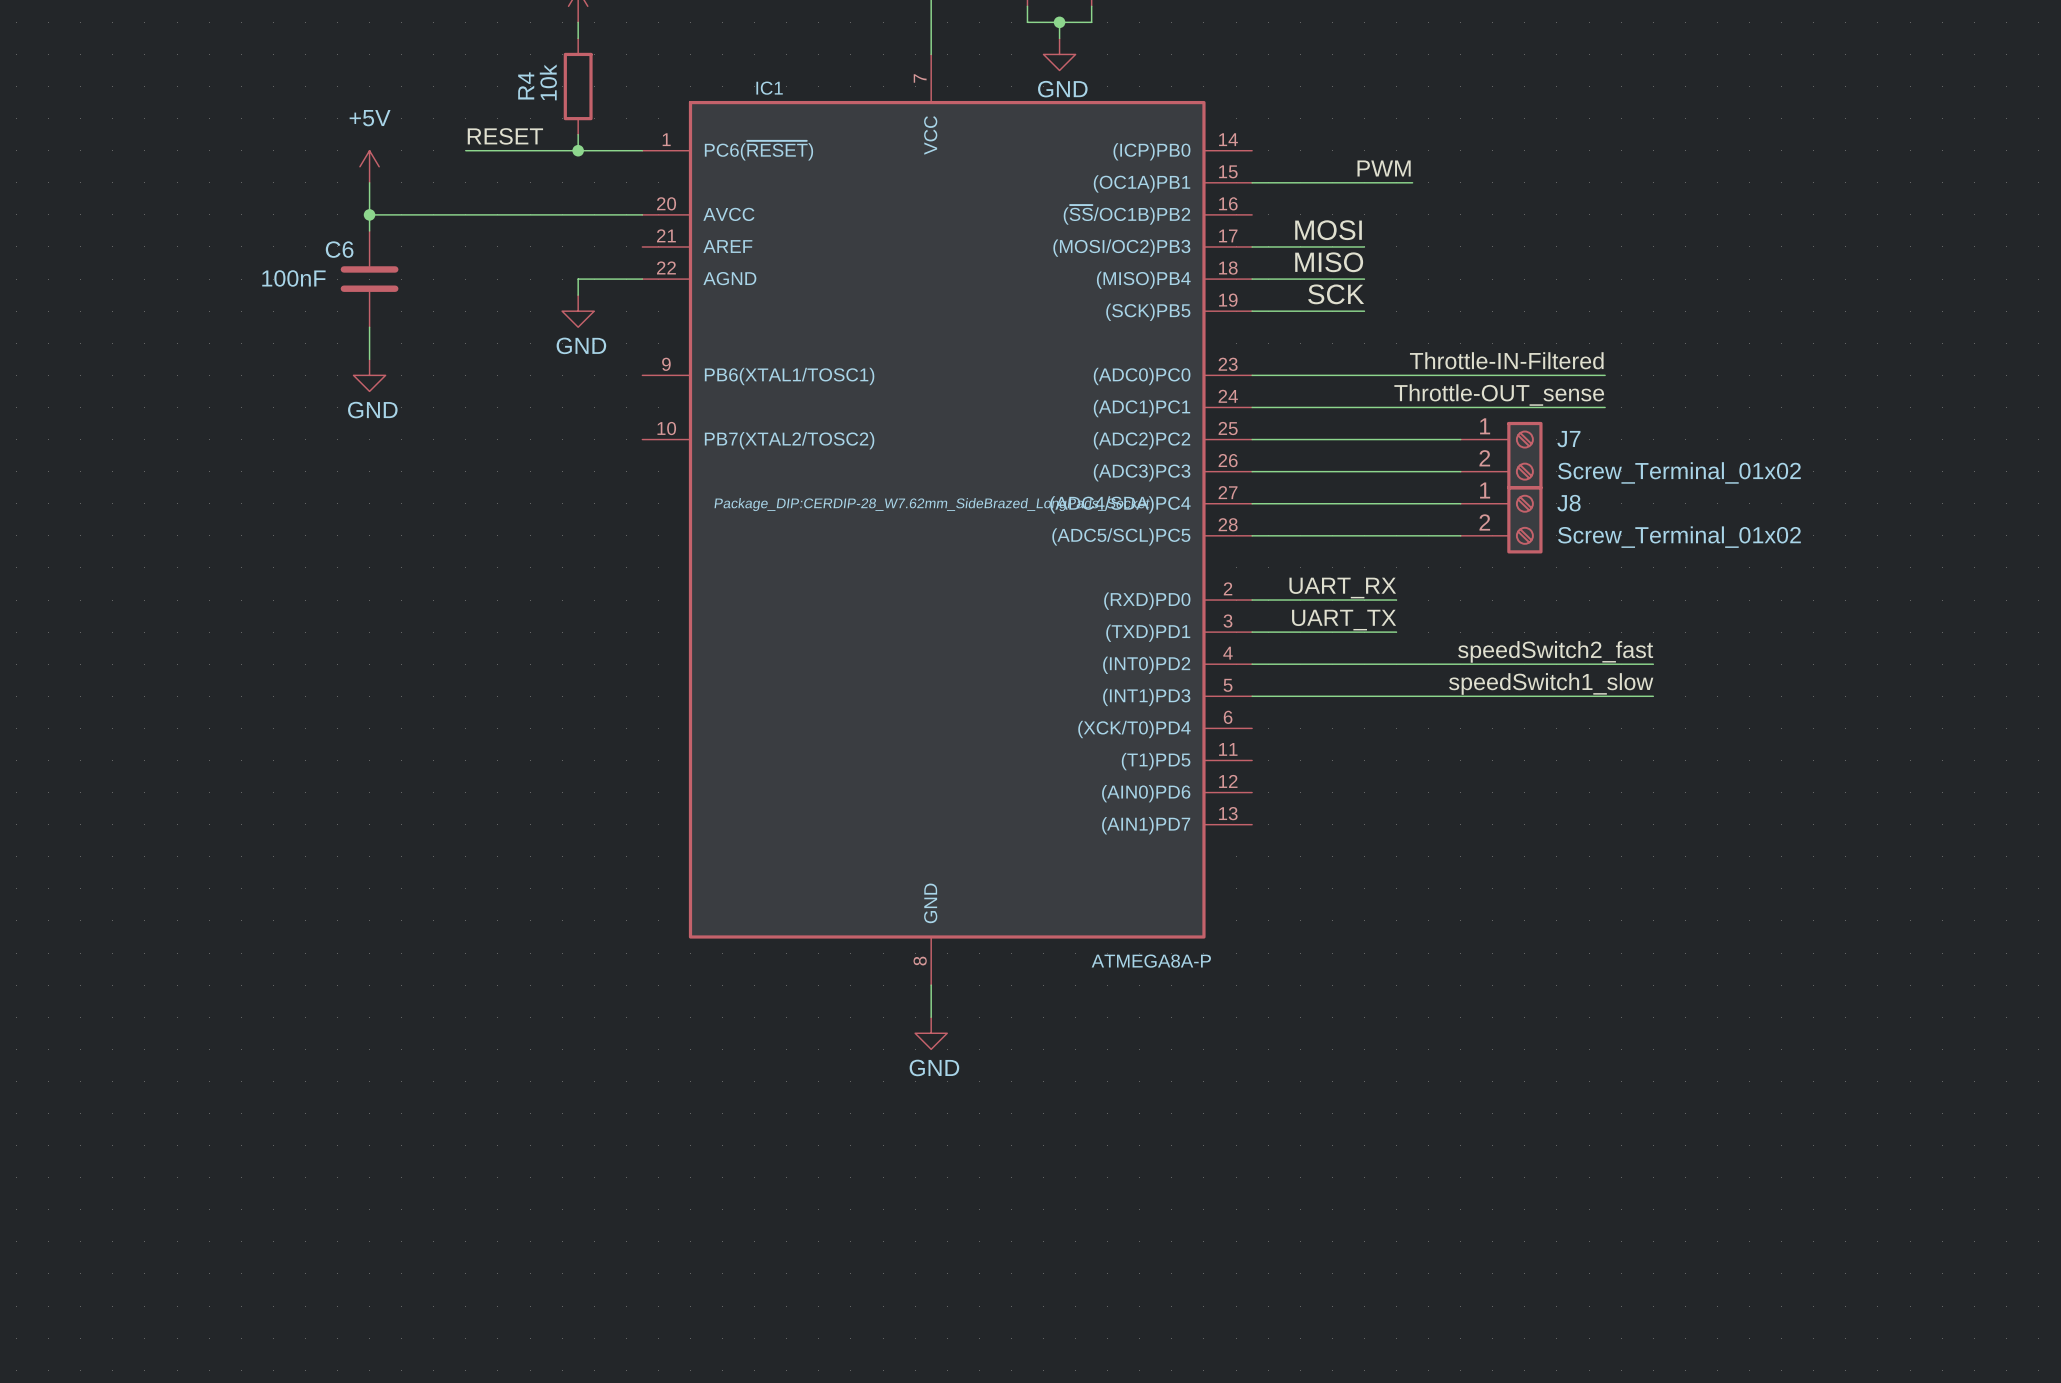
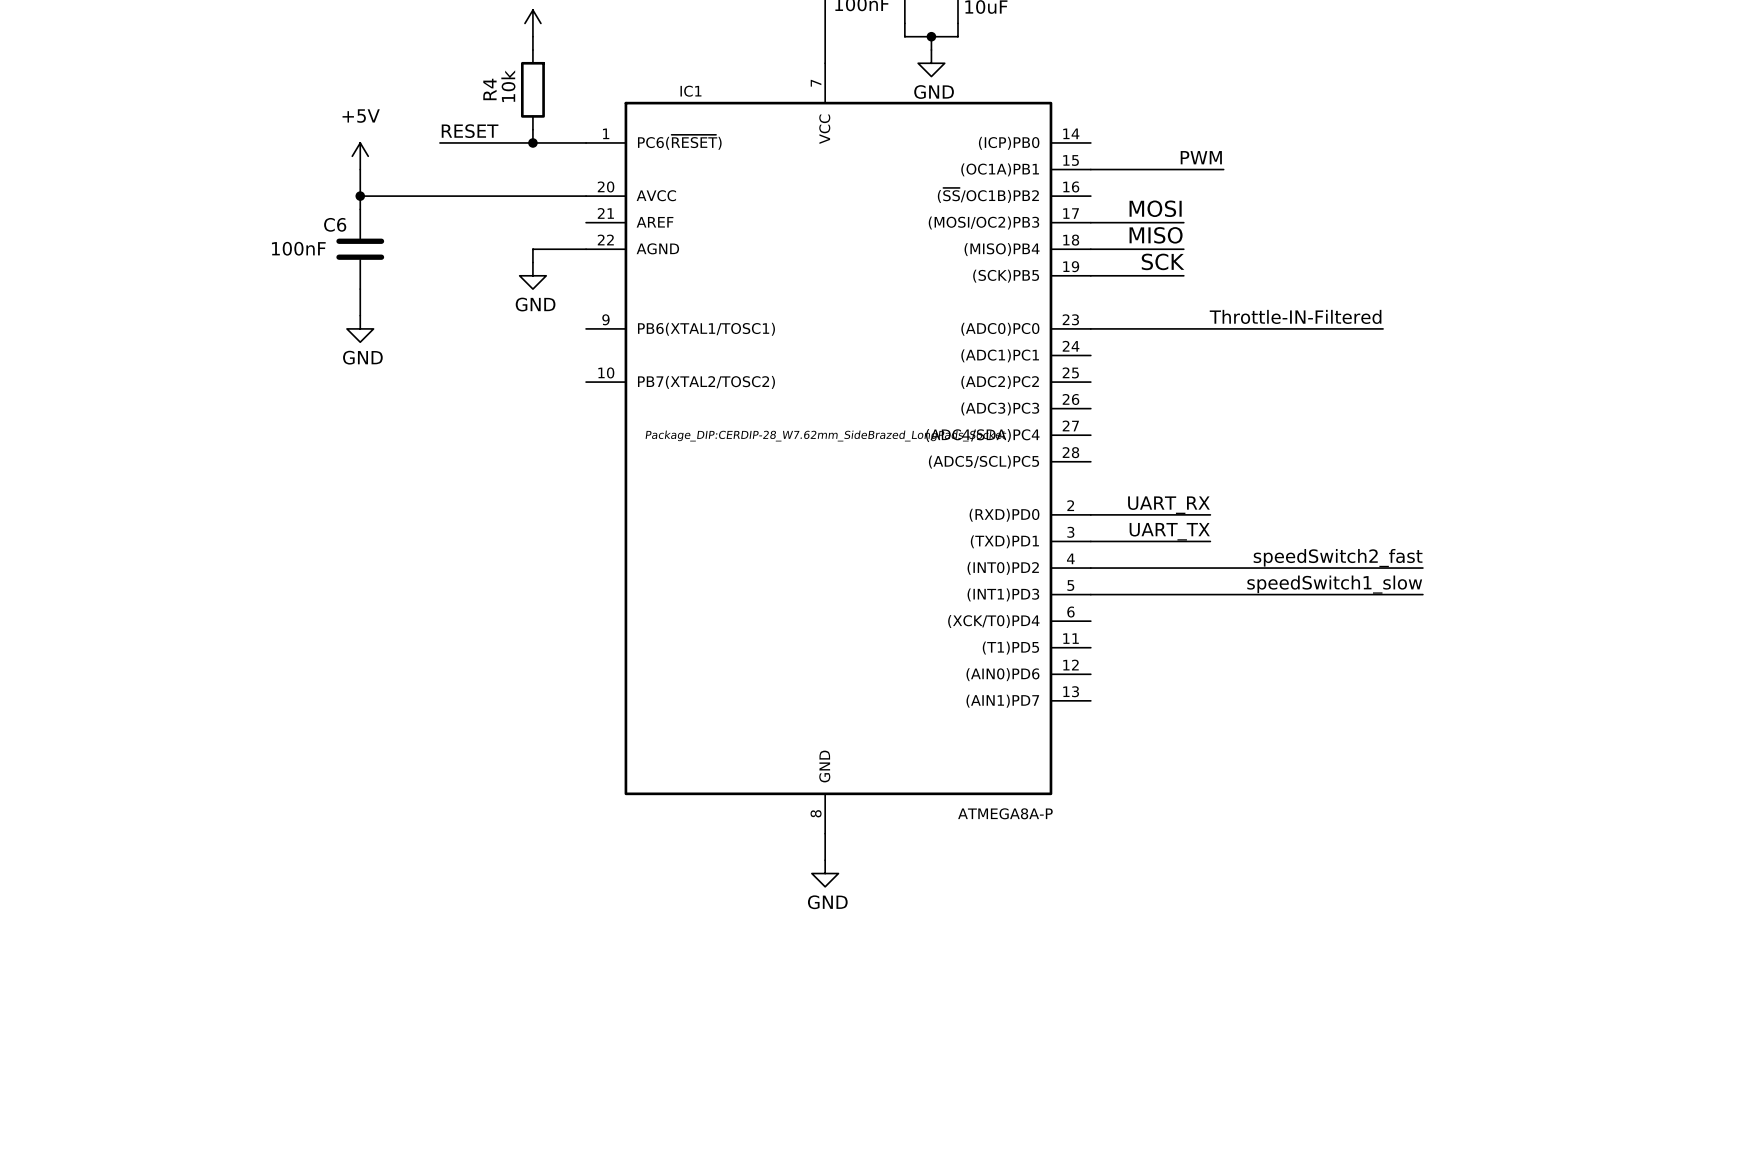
label: Throttle-OUT_sense (1499, 395) -> none
wire: (1252, 407) (1605, 407) -> none
wire: (1252, 439) (1460, 439) -> none
J7: Screw_Terminal_01x02 (1501, 455) -> none
wire: (1252, 471) (1460, 471) -> none
wire: (1252, 503) (1460, 503) -> none
J8: Screw_Terminal_01x02 (1501, 519) -> none
wire: (1252, 535) (1460, 535) -> none

